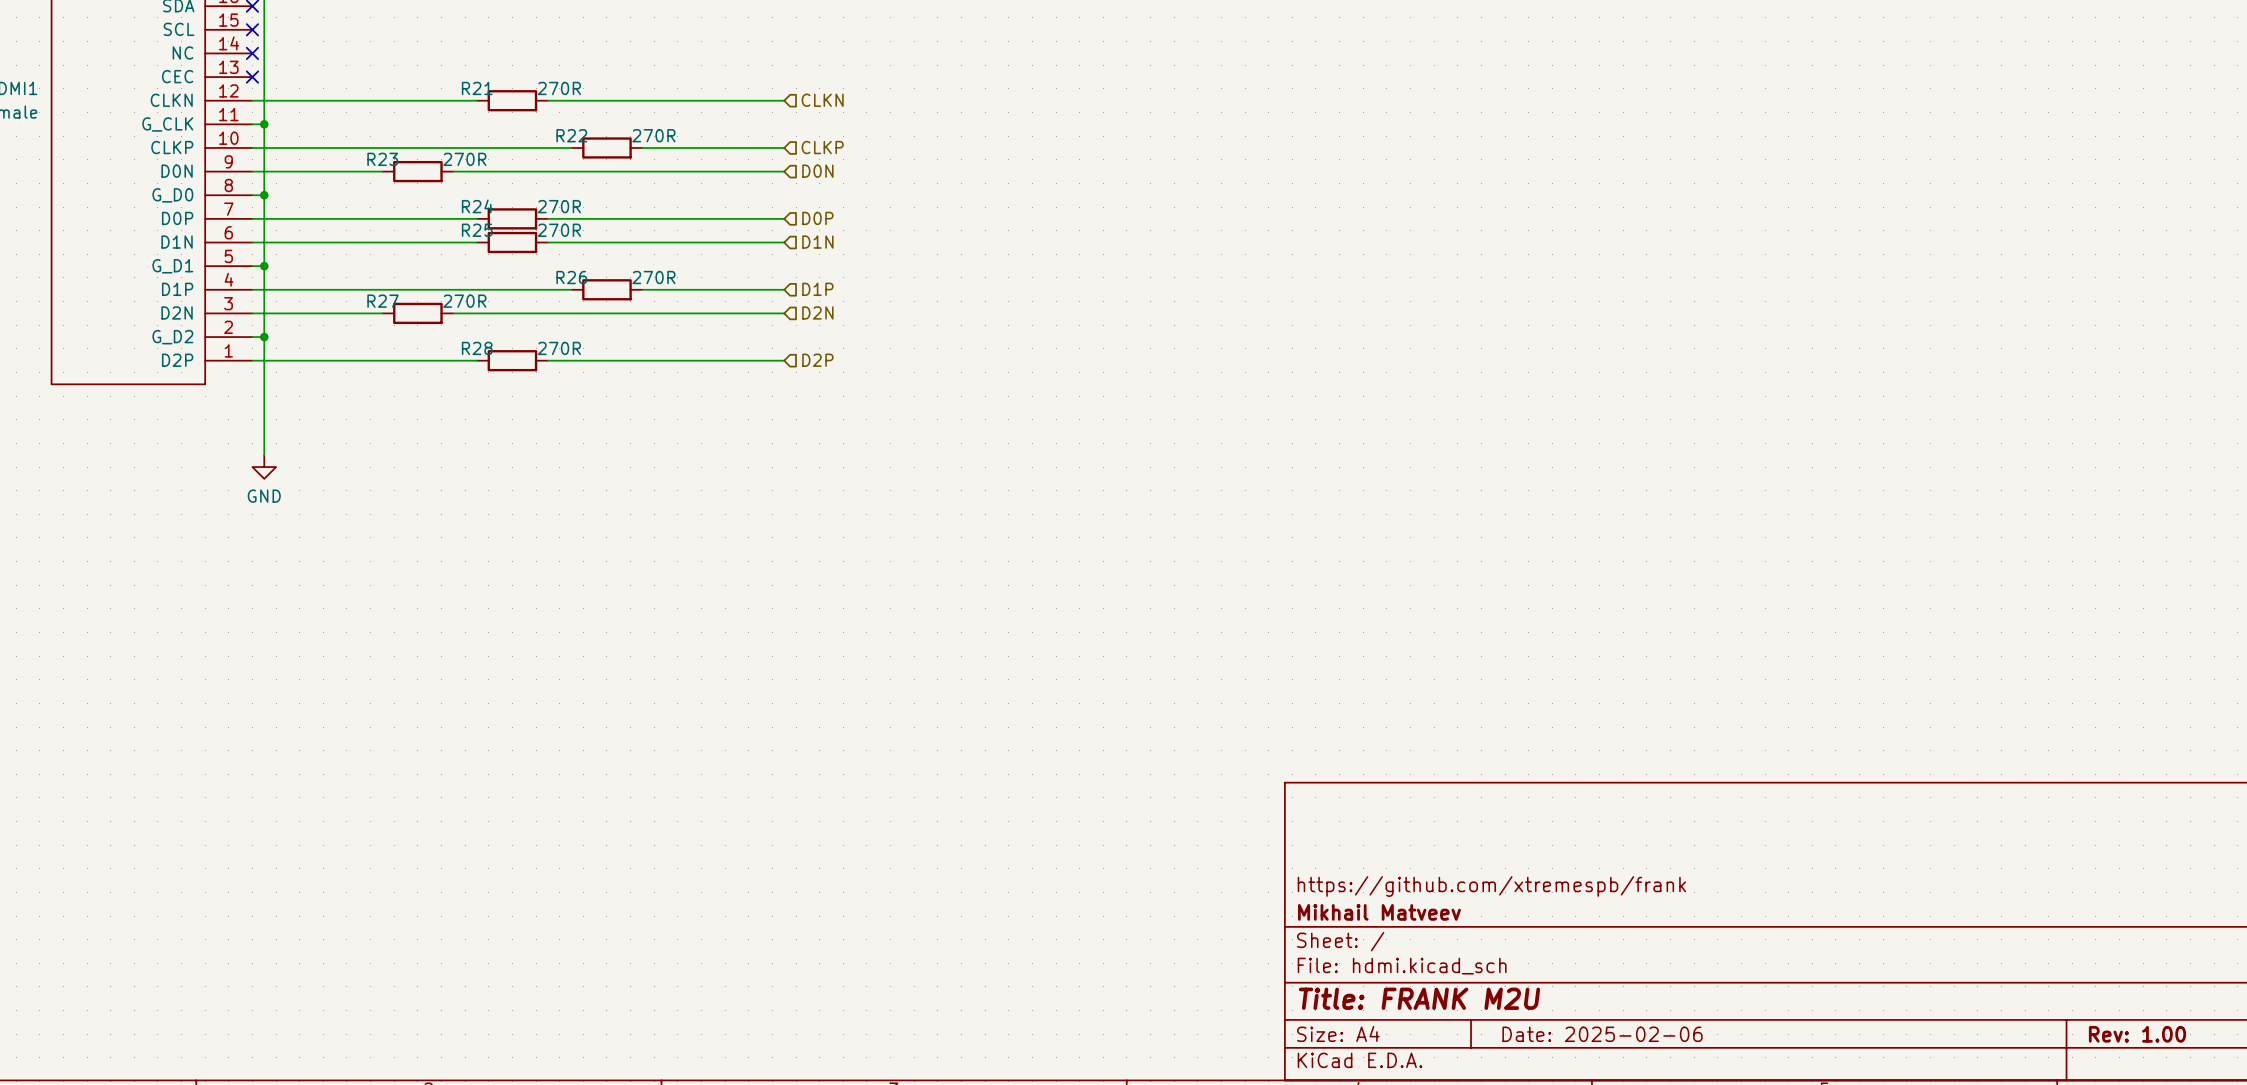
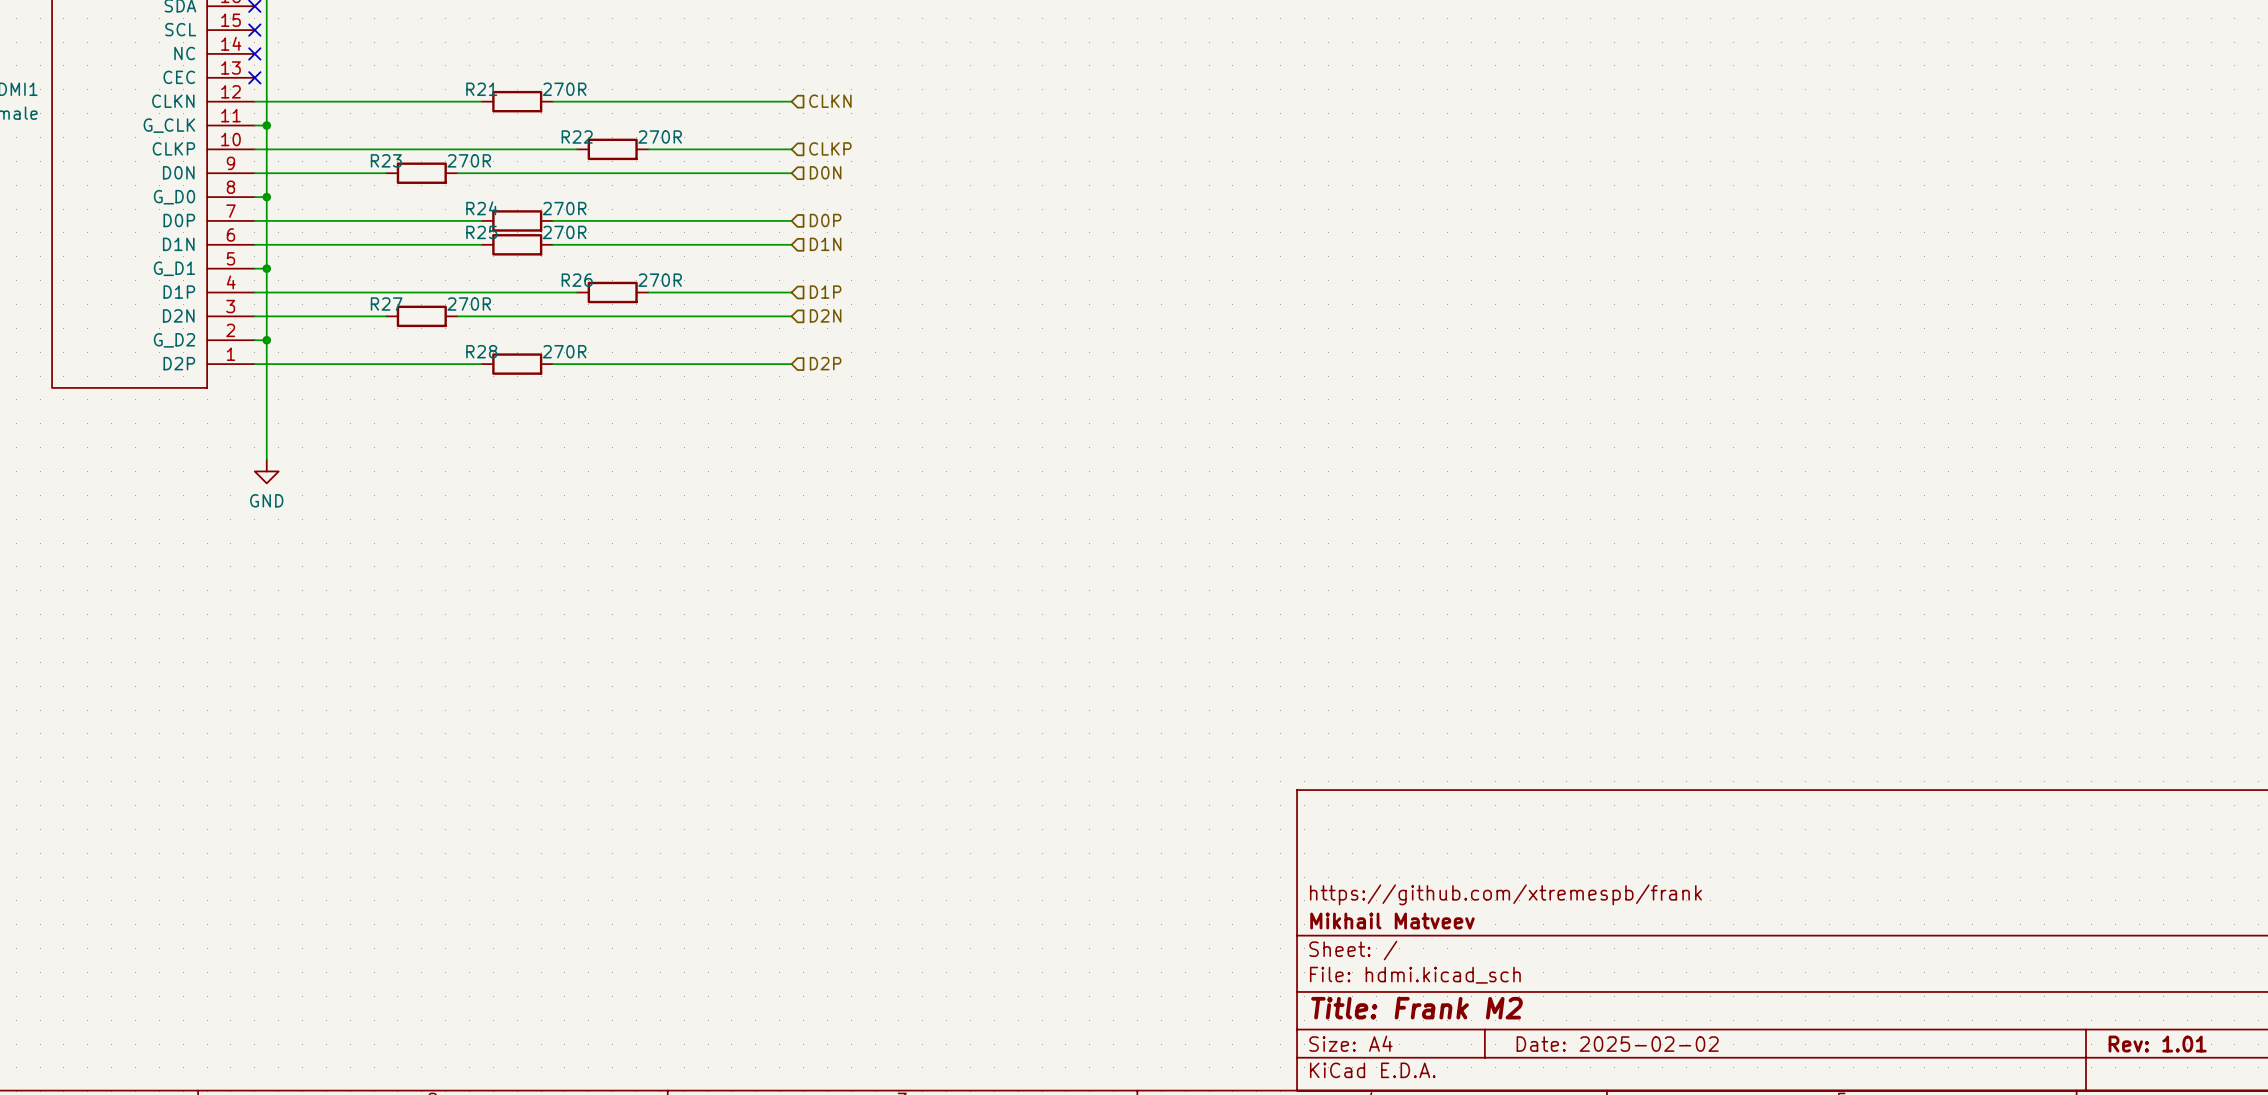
title block: Title: FRANK M2U (1419, 998) -> Title: Frank M2 (1417, 1008)
title block: Date: 2025-02-06 (1602, 1034) -> Date: 2025-02-02 (1617, 1044)
title block: Rev: 1.00 (2137, 1034) -> Rev: 1.01 (2157, 1044)

